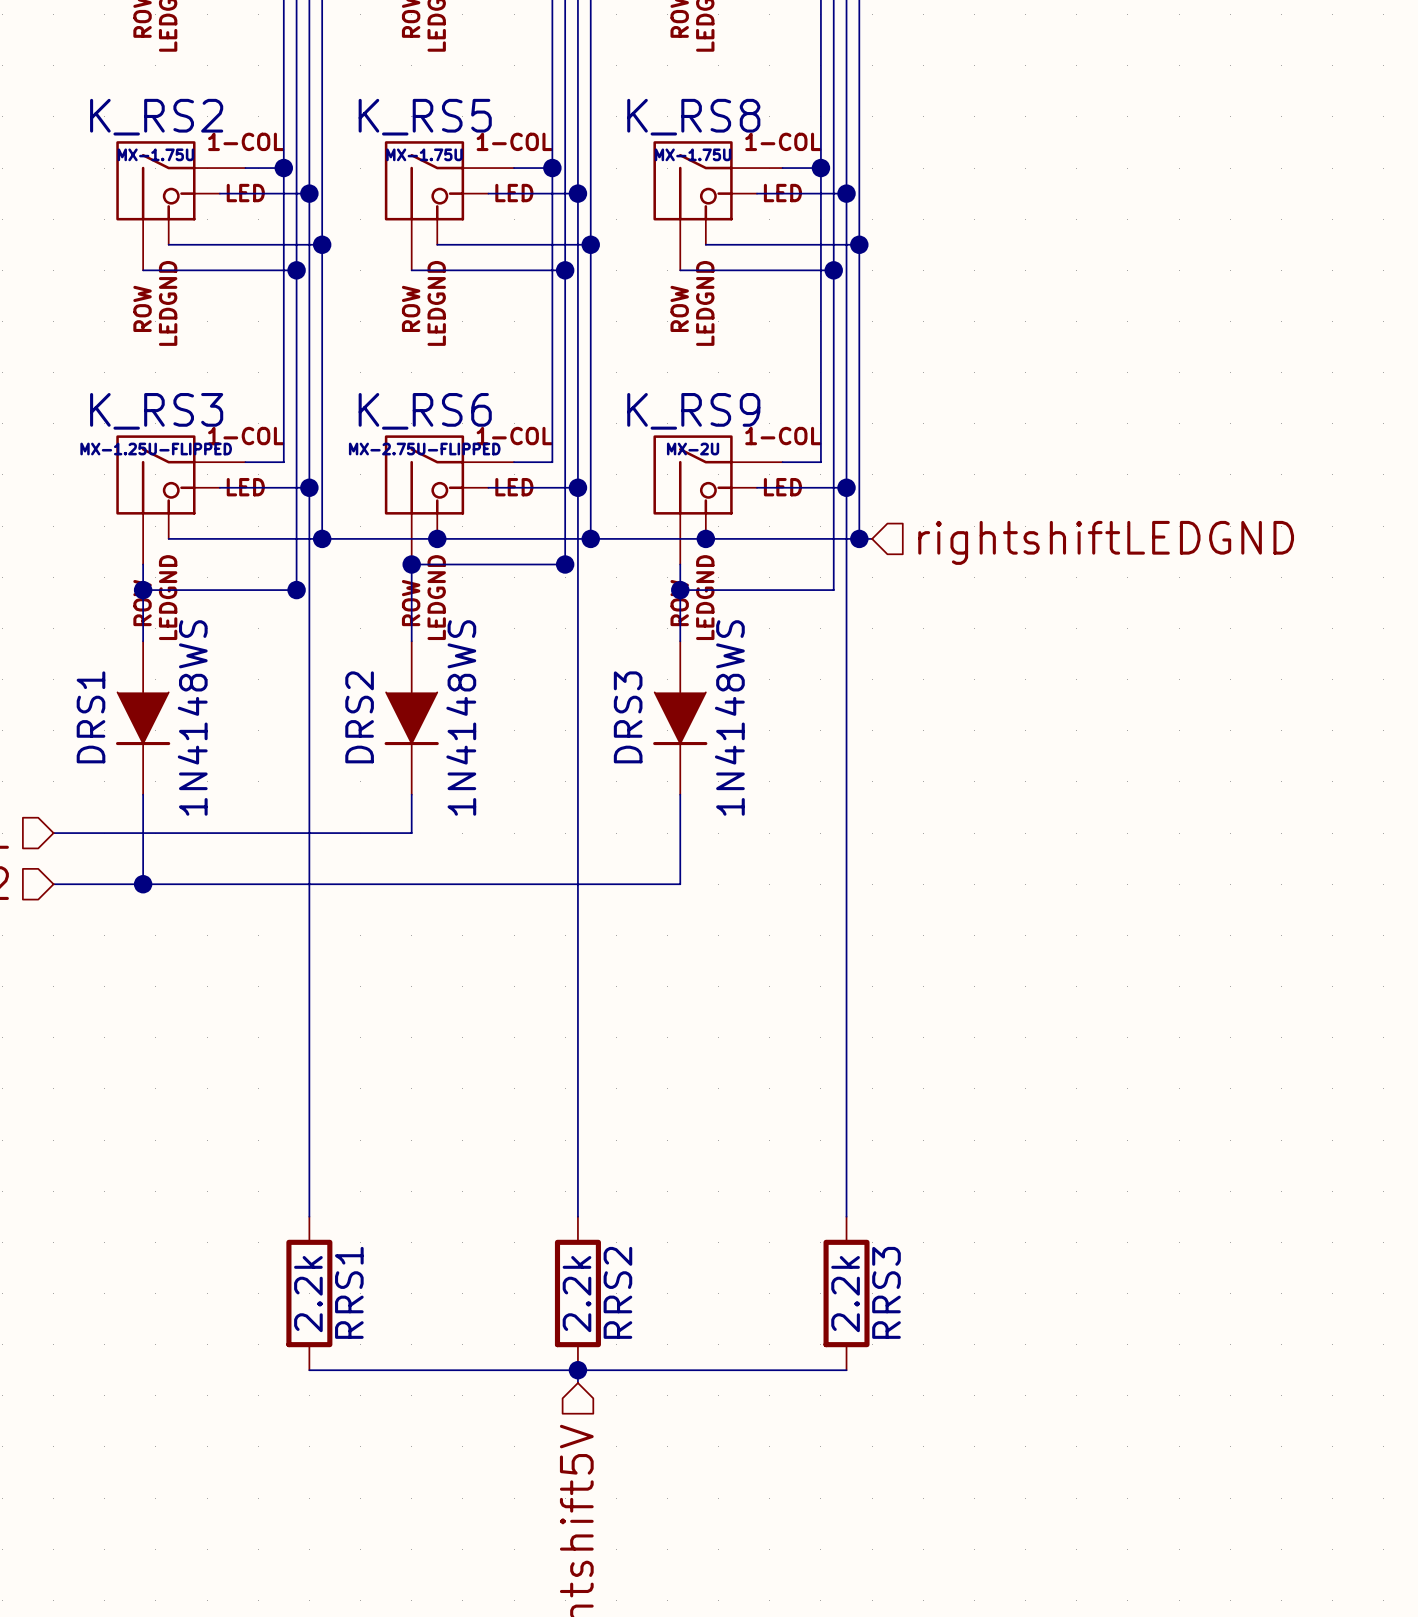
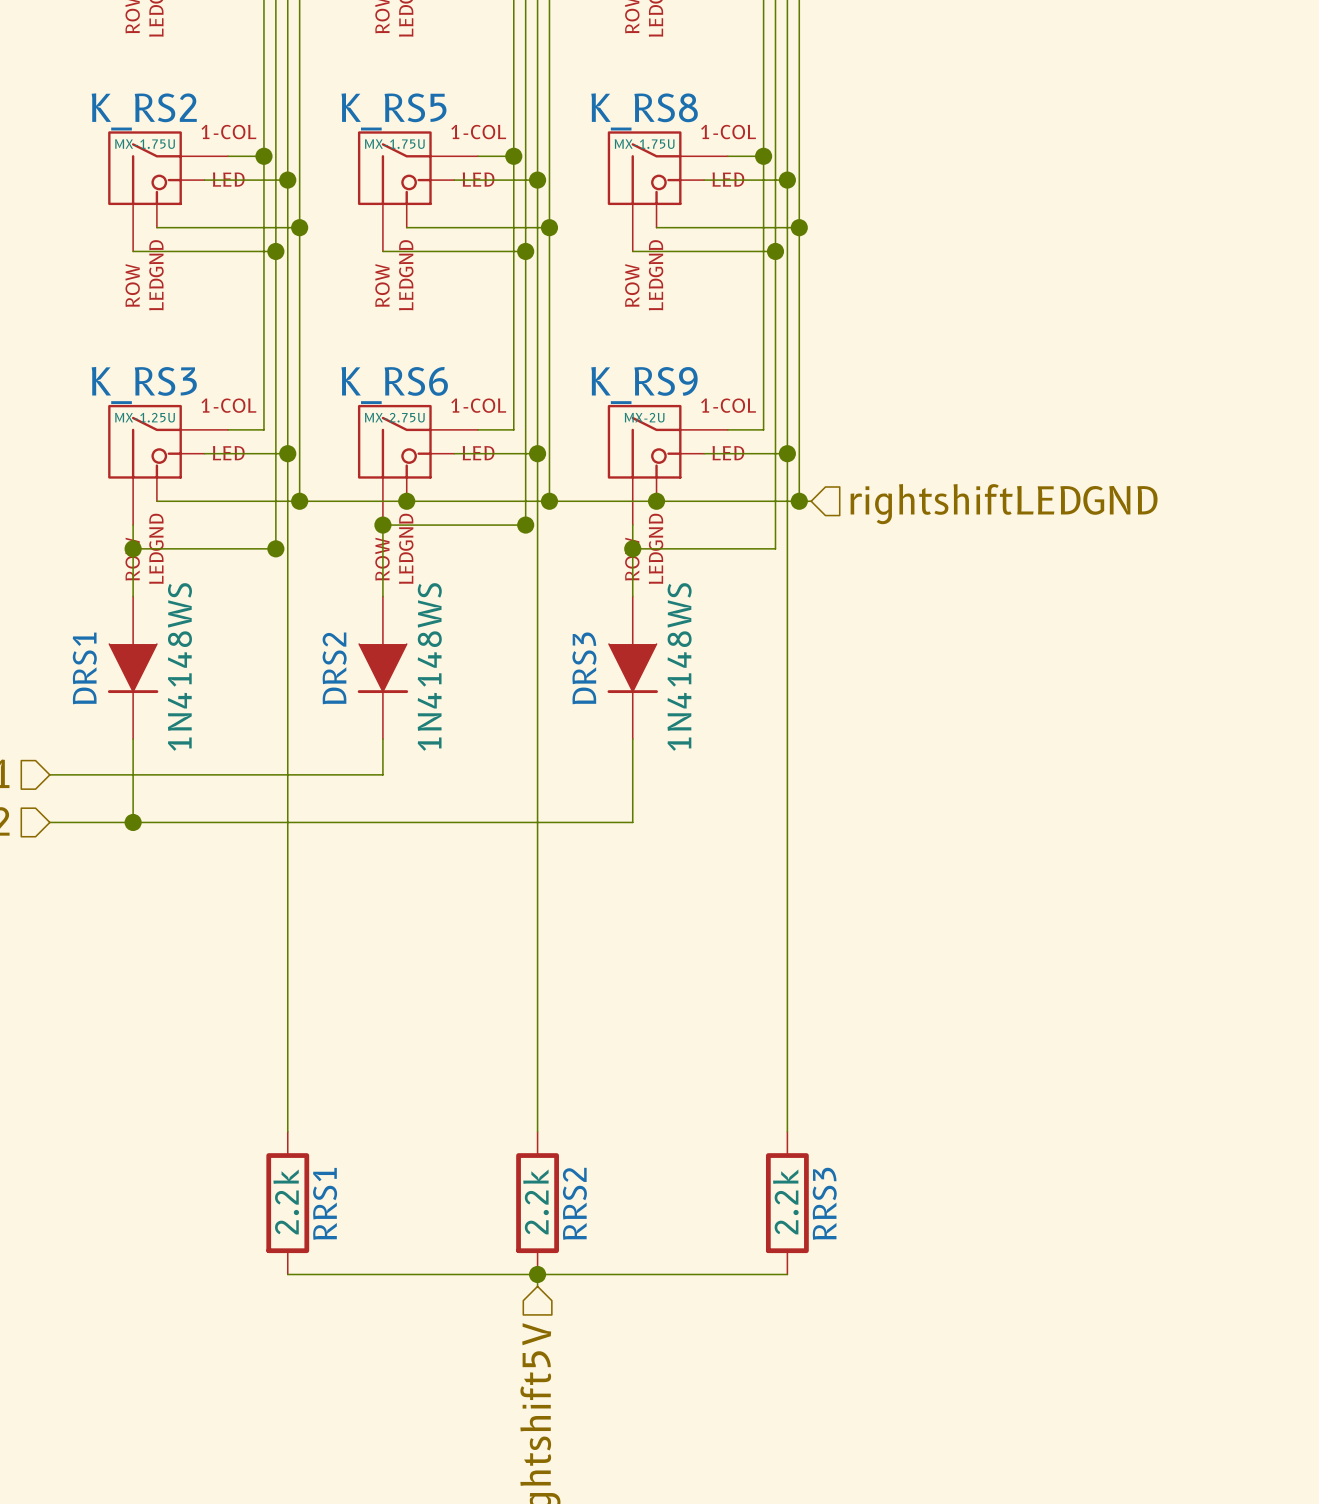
K_RS3 value: MX-1.25U-FLIPPED (156, 449) -> MX-1.25U (144, 417)
K_RS6 value: MX-2.75U-FLIPPED (424, 449) -> MX-2.75U (394, 417)

